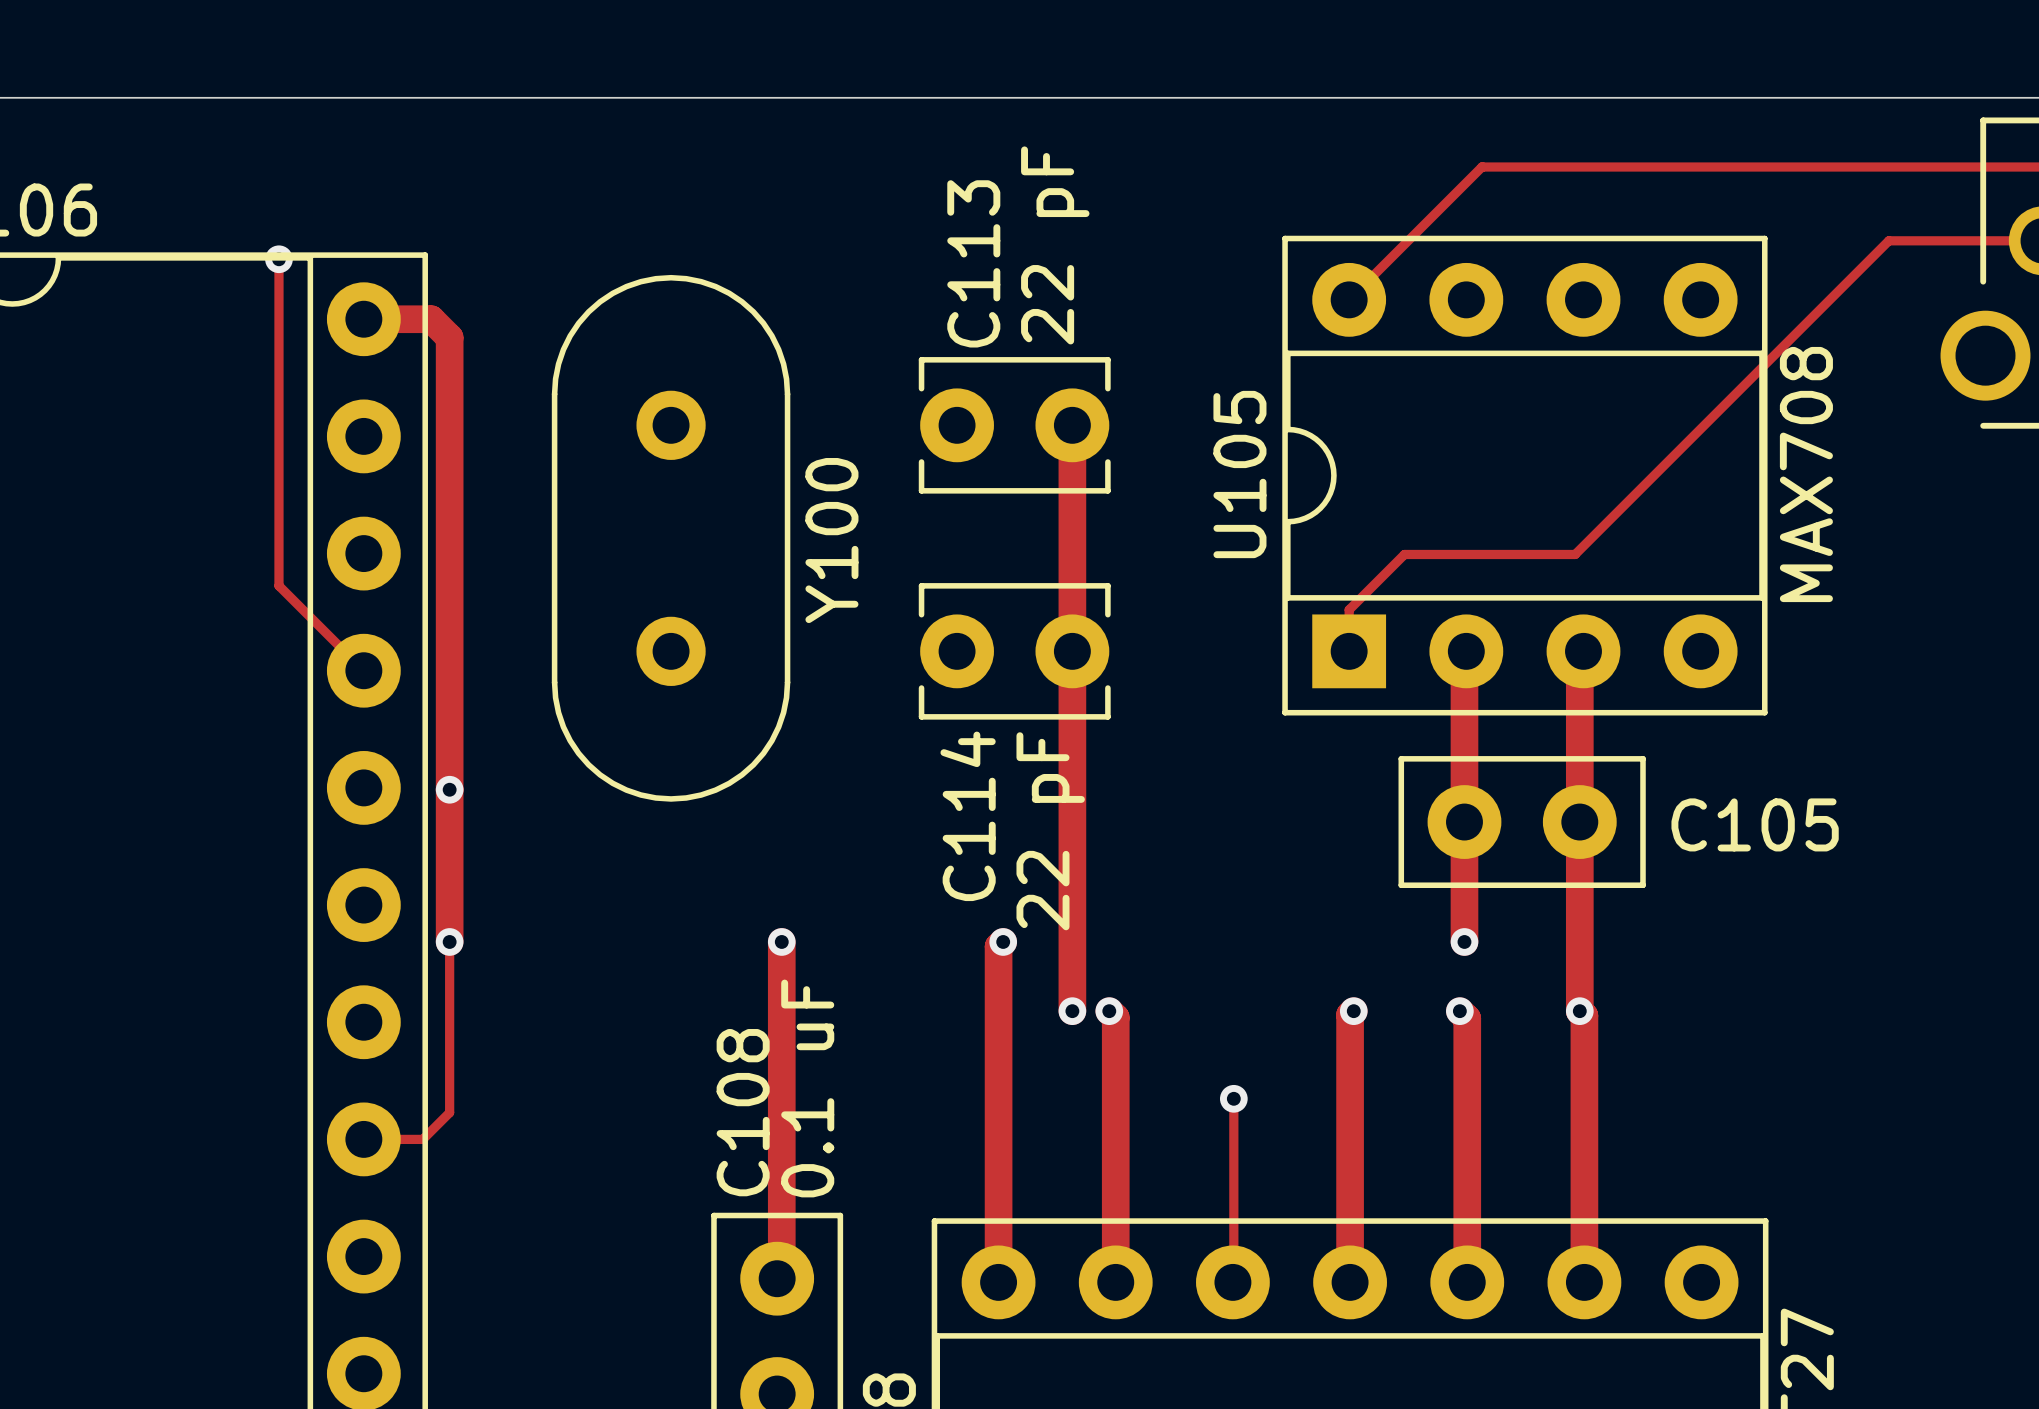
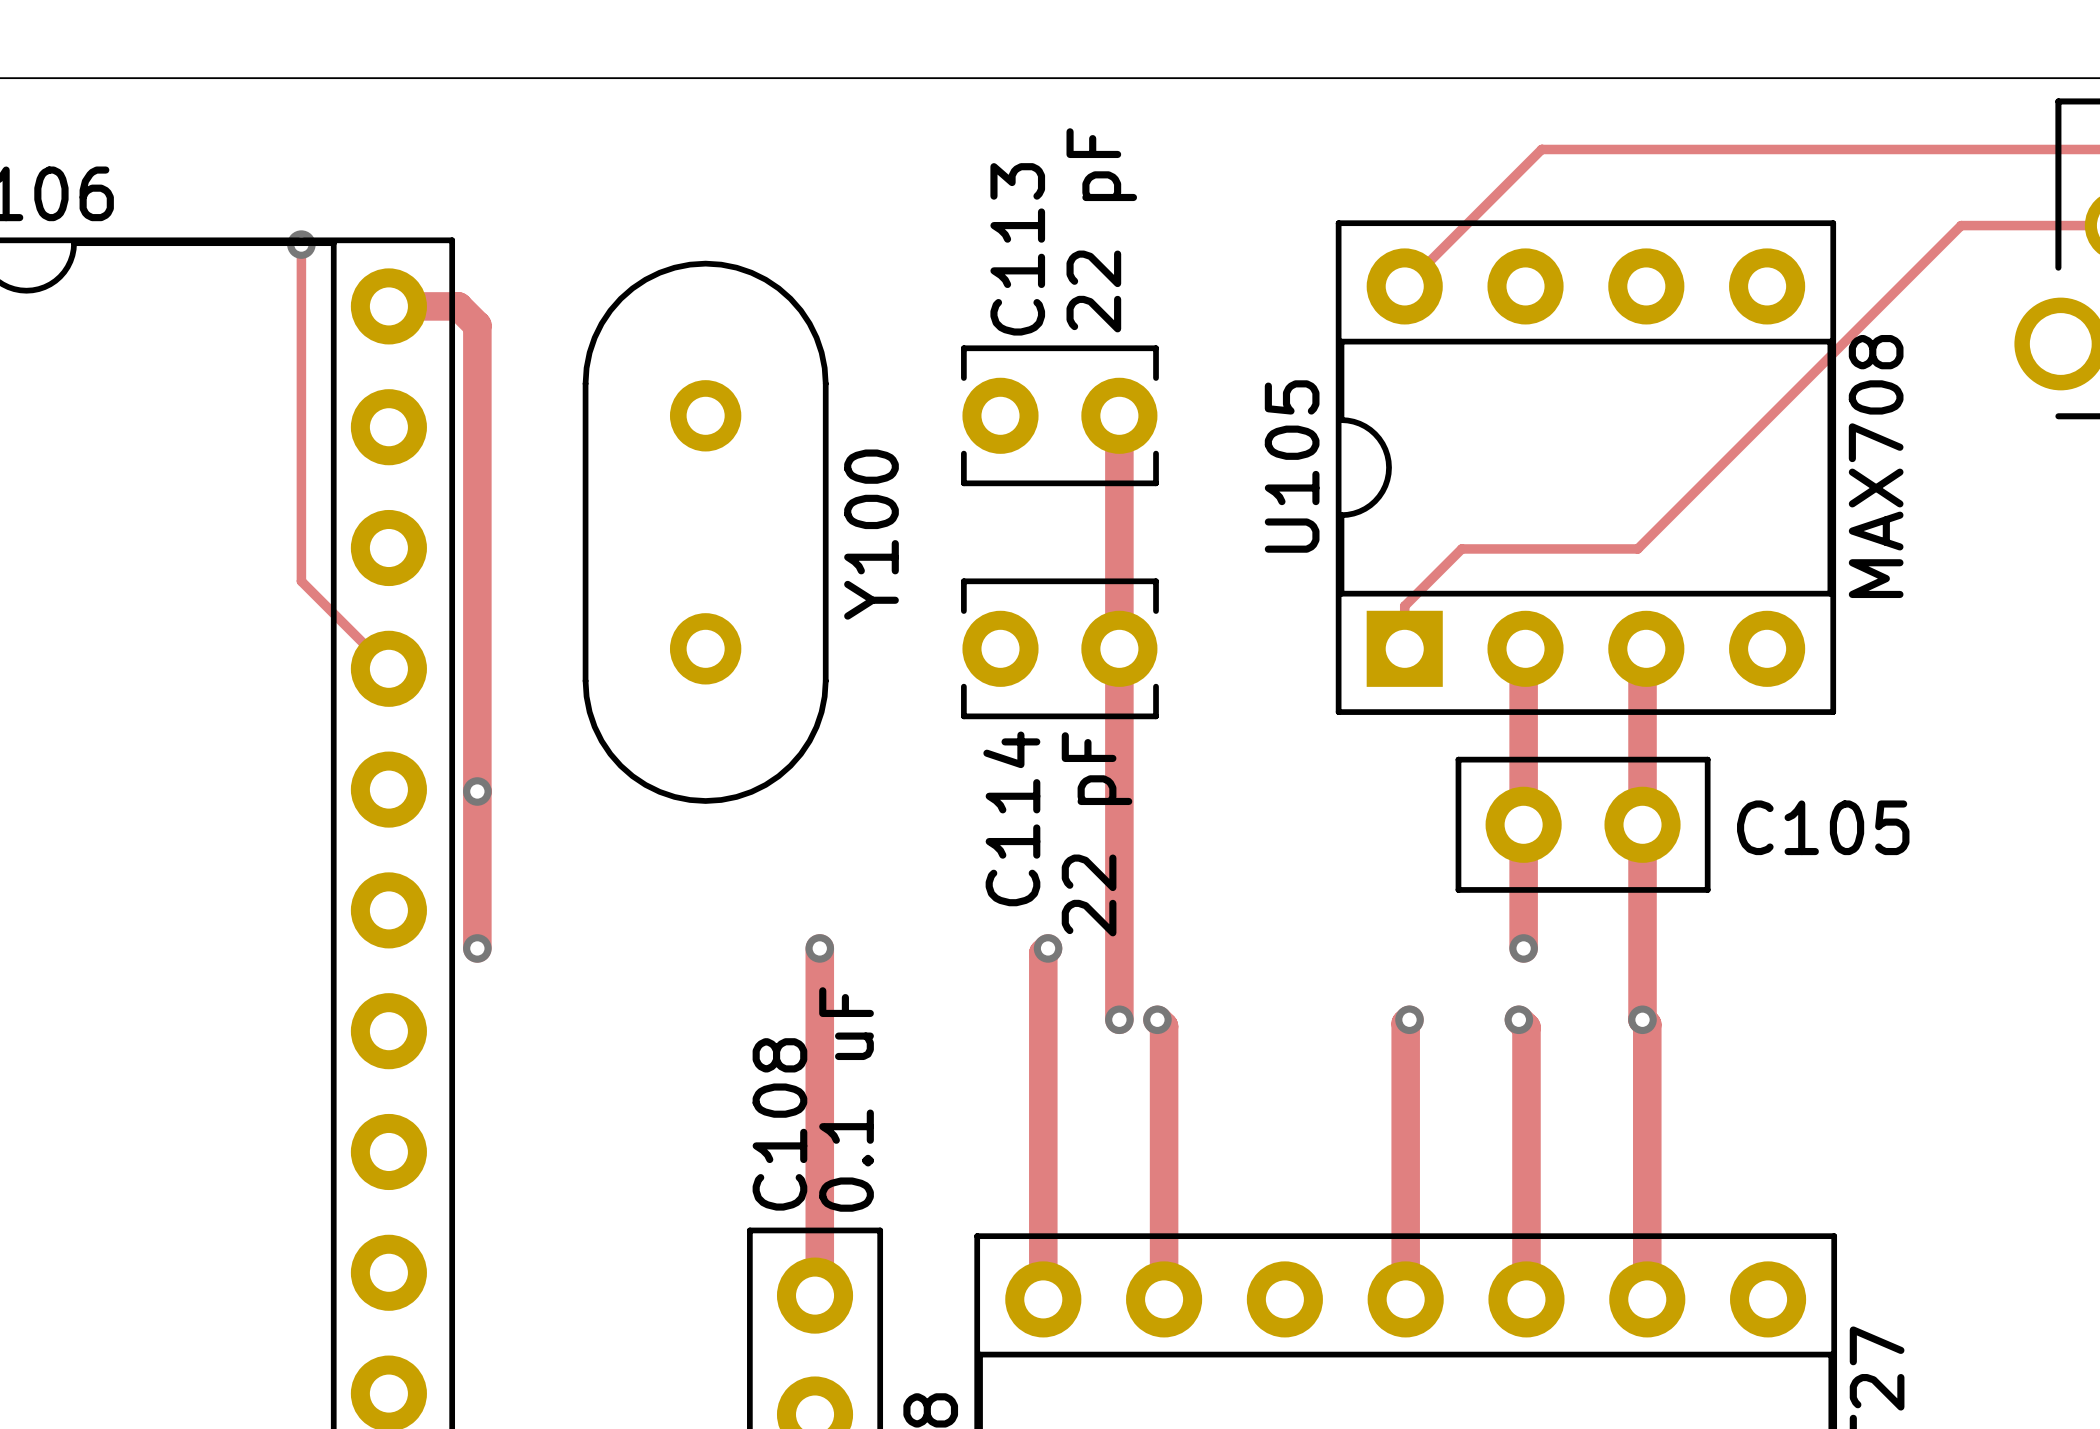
track: (449, 941) (449, 1112) (422, 1139) (363, 1139) -> none
track: (1233, 1098) (1232, 1282) -> none
via: (1233, 1098) -> none

